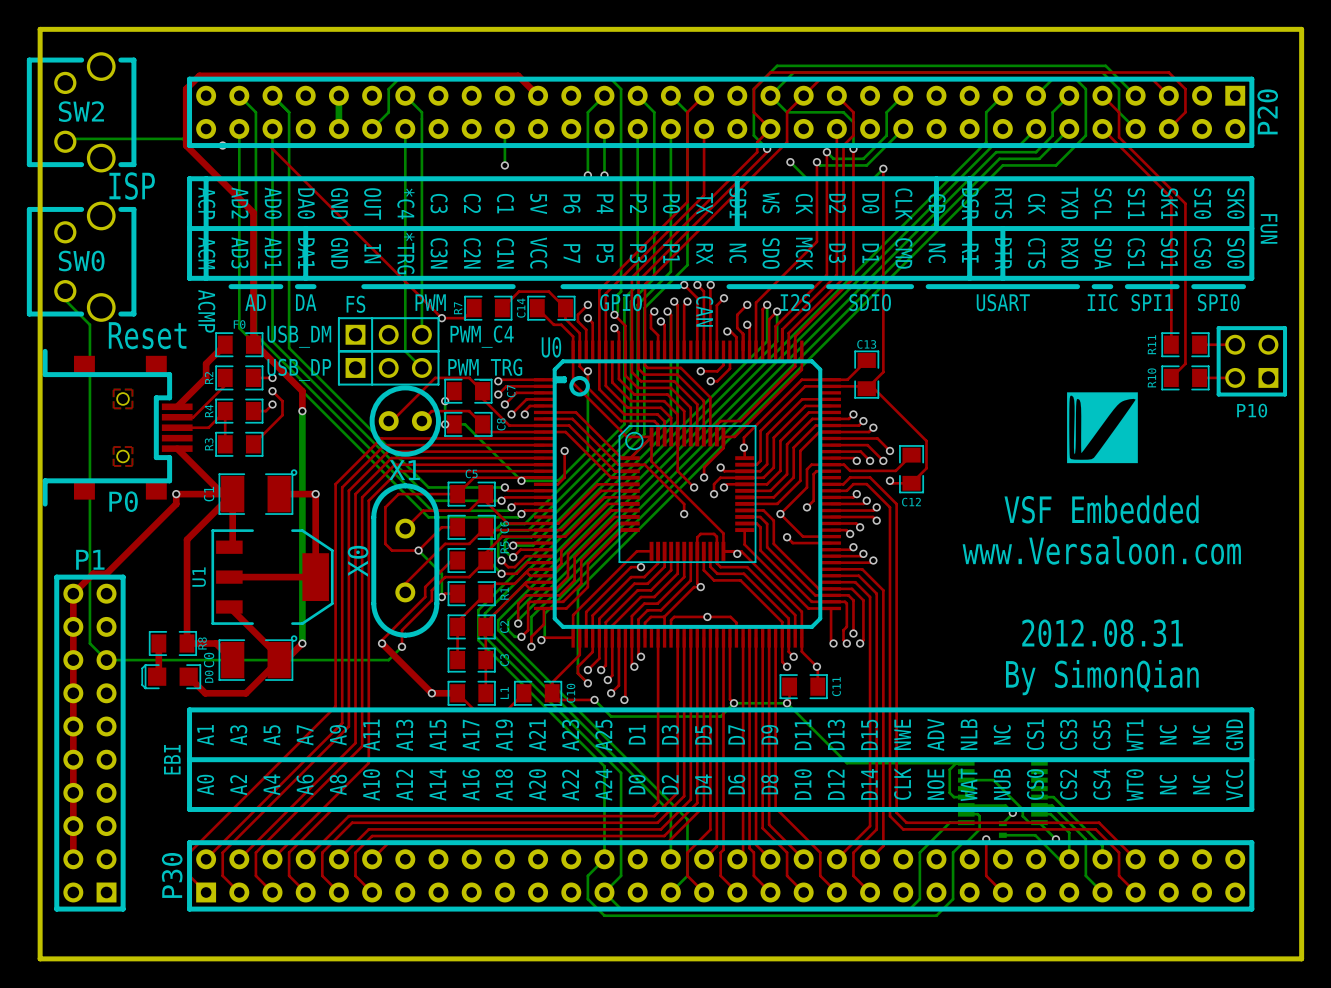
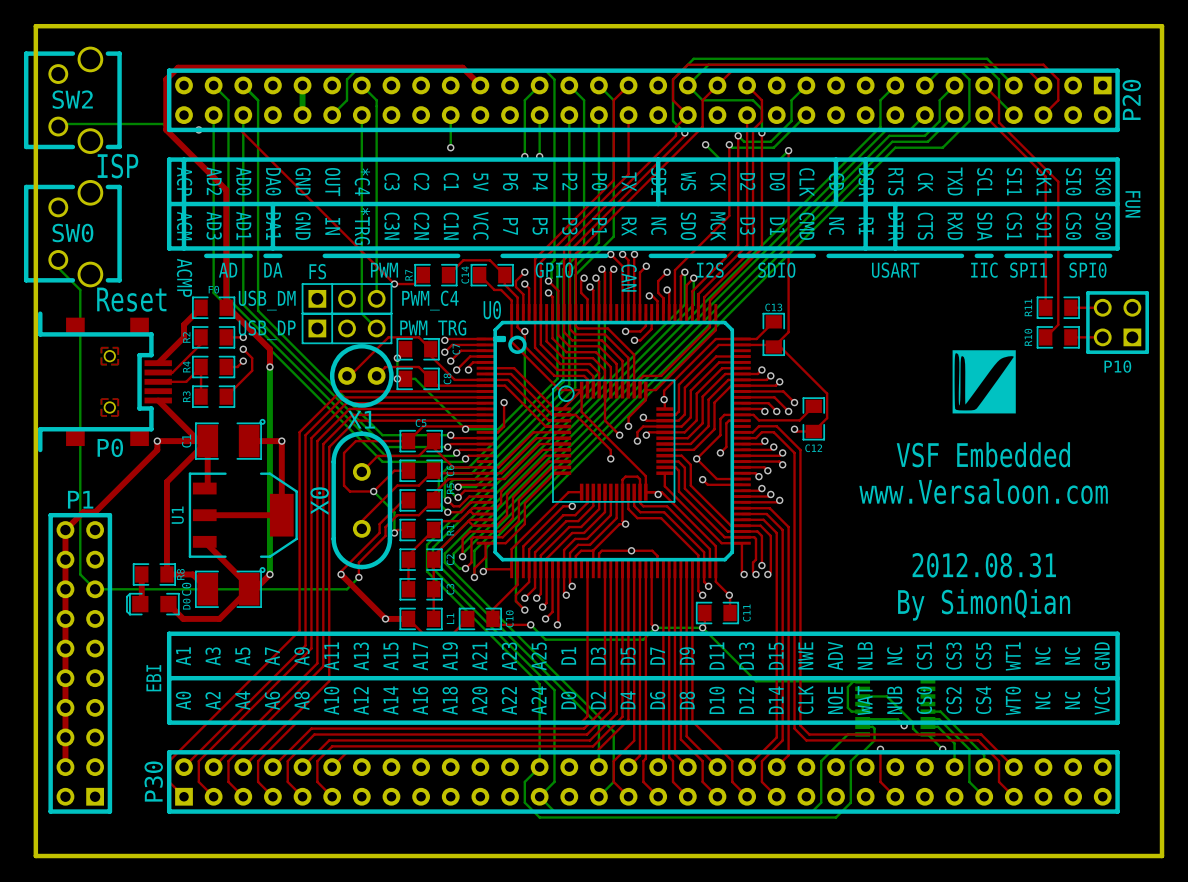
bottom track: (1012, 812) (1002, 823) -> none
part: (1002, 829) -> none
bottom track: (1002, 835) (1035, 835) (1059, 859) (1069, 859) -> none

